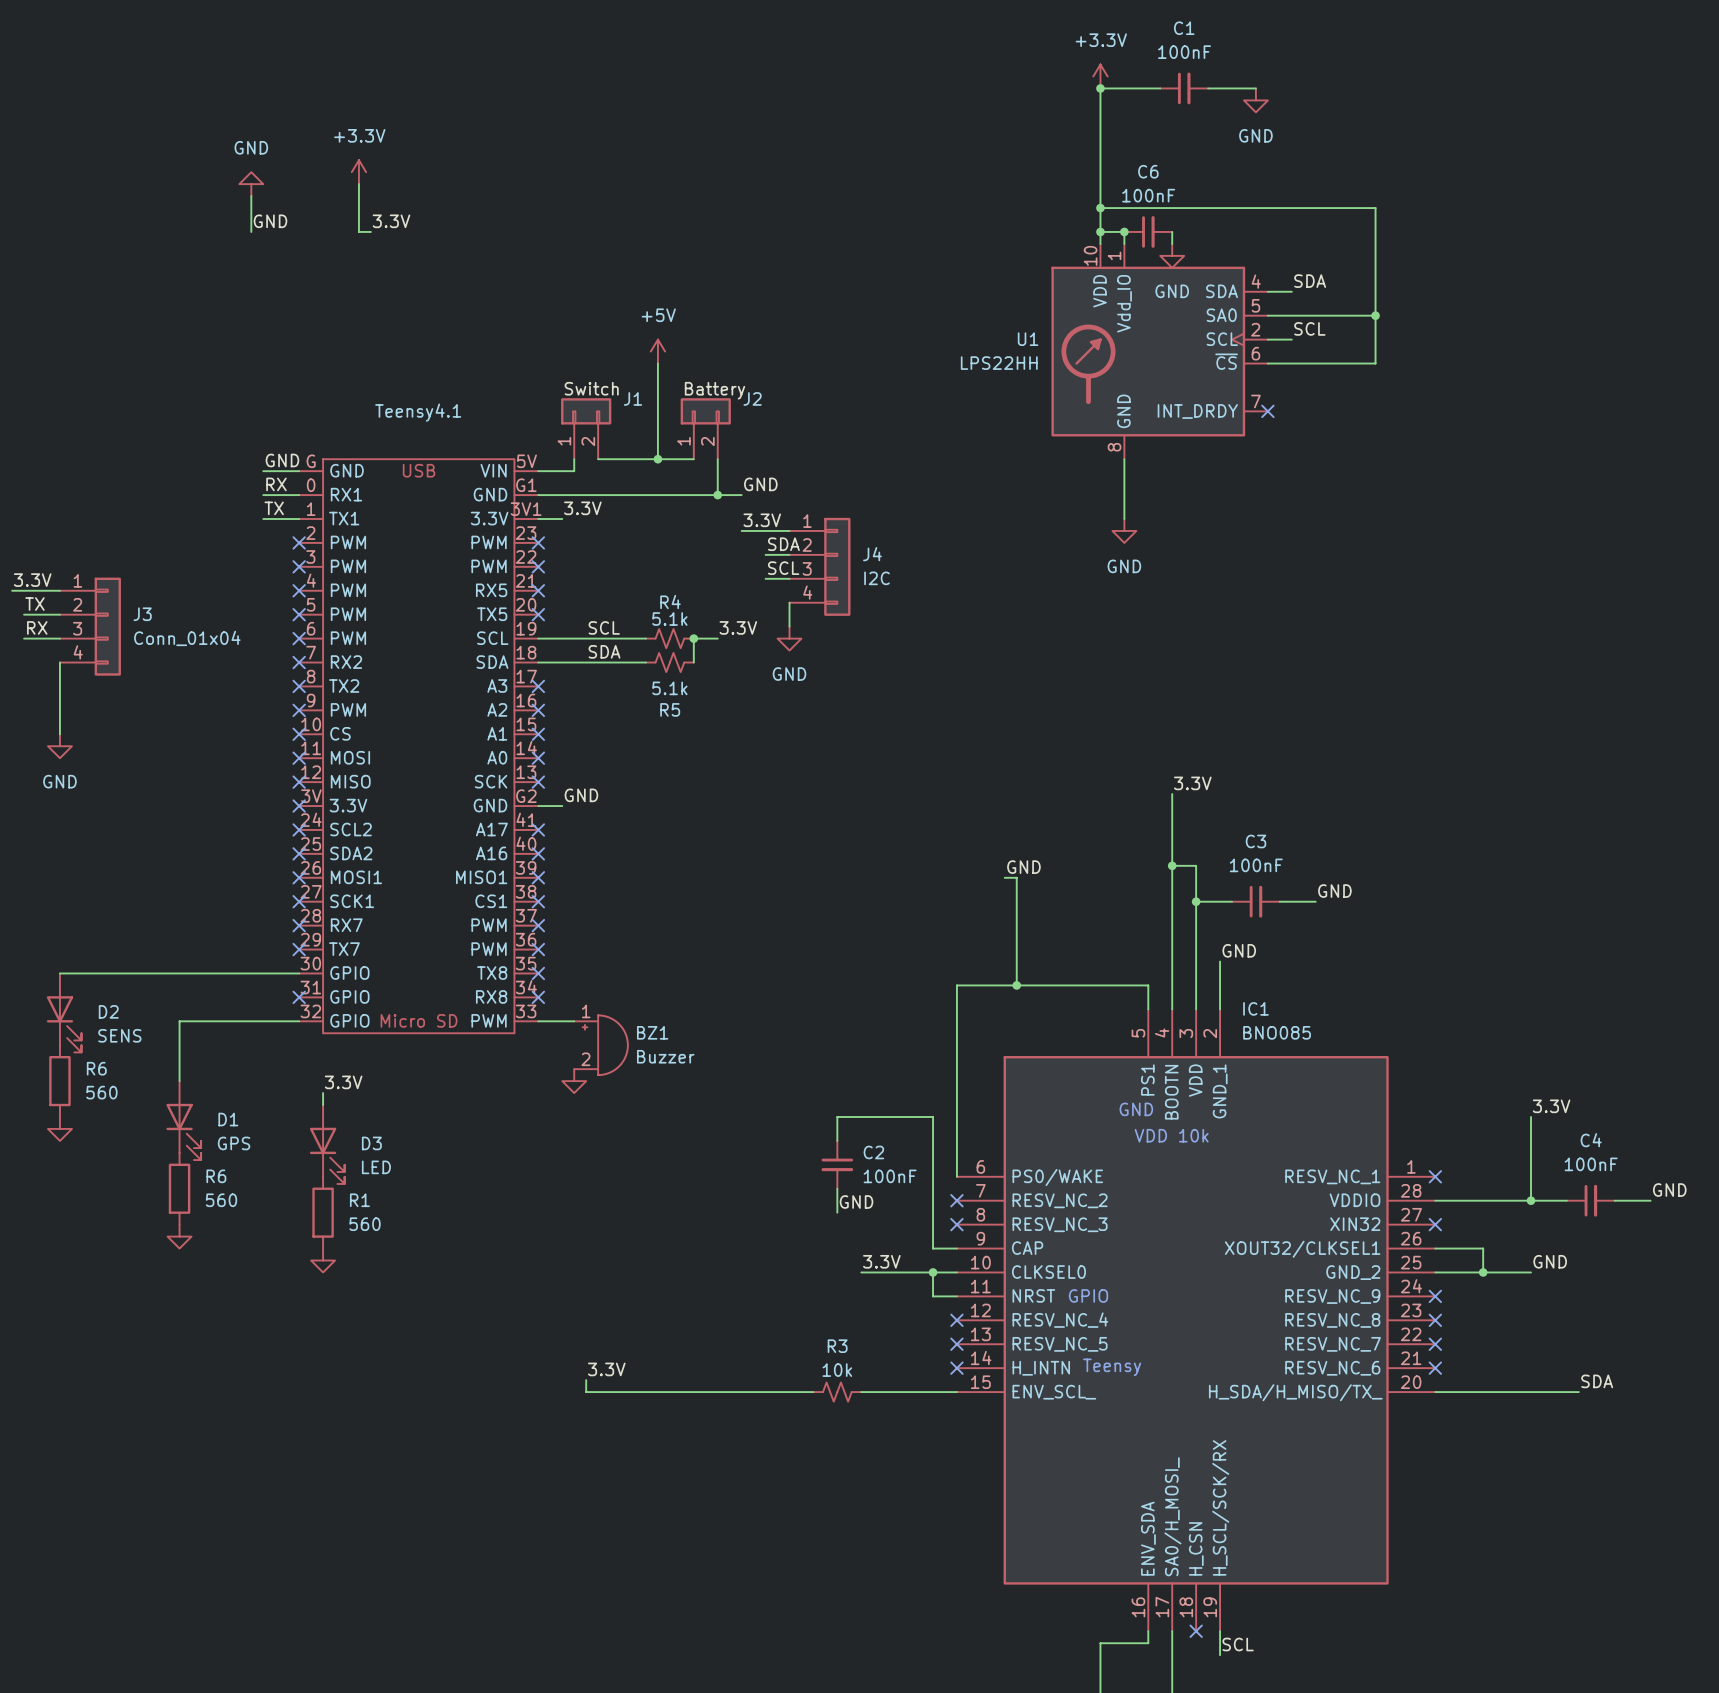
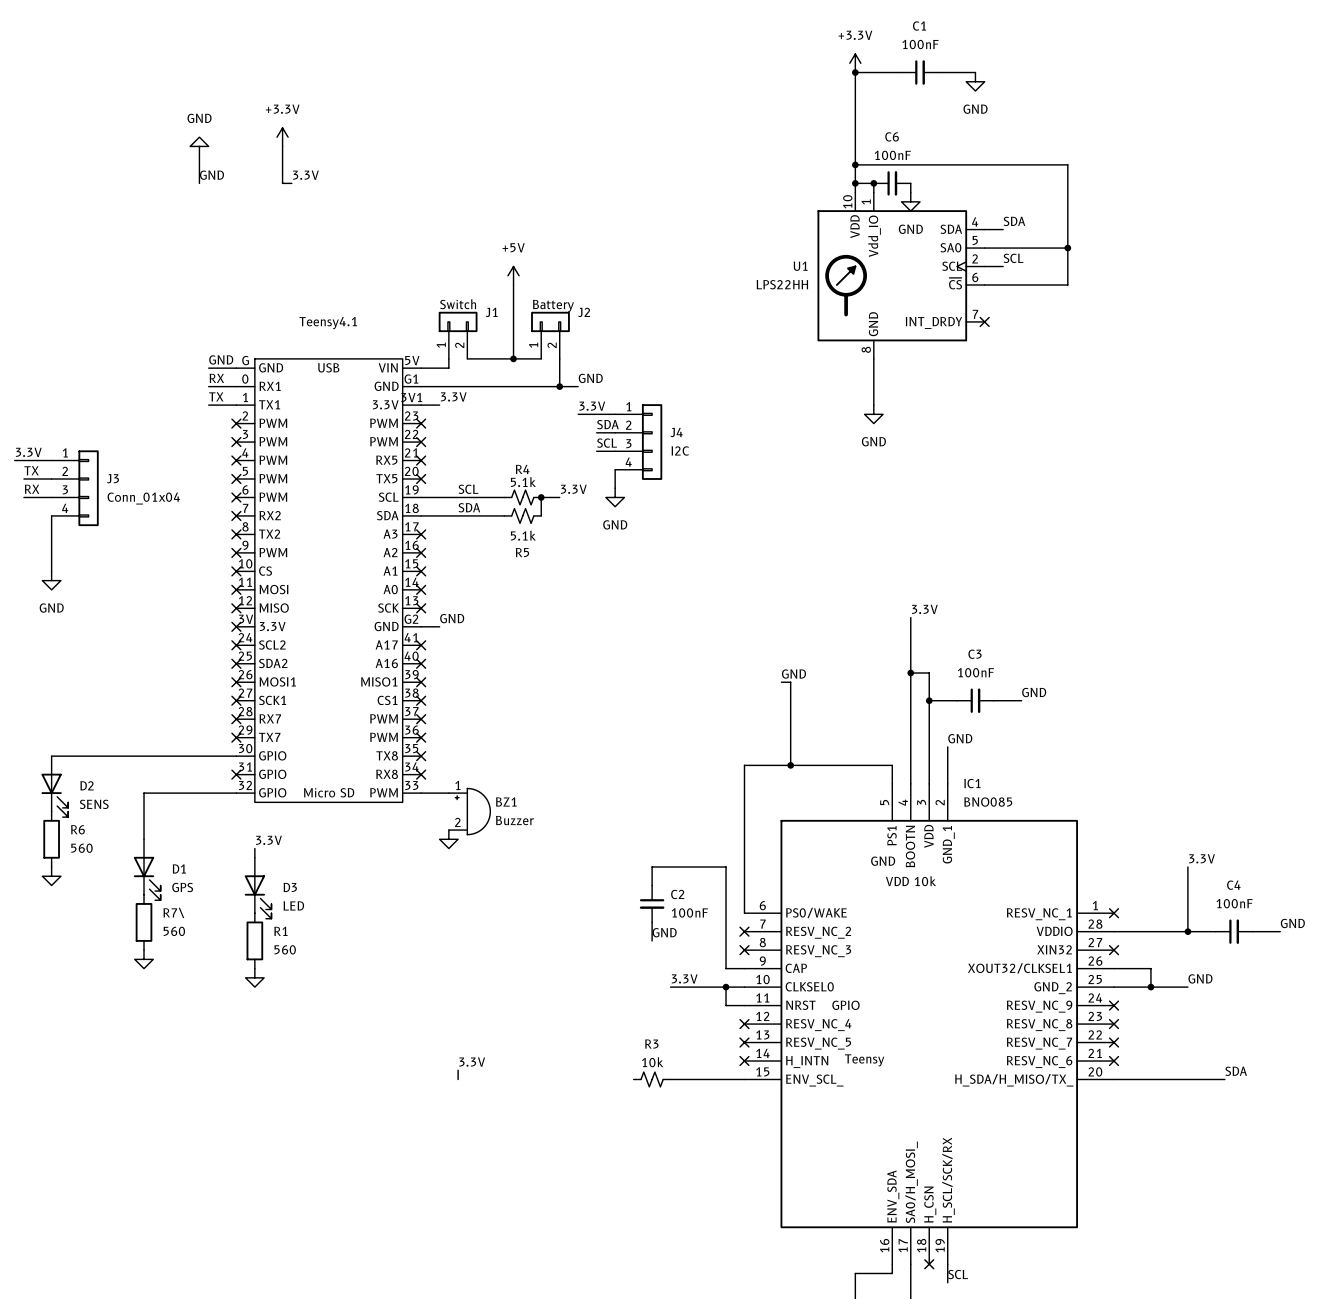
R6 name: R6 (216, 1176) -> R7\ (173, 912)
wire: (586, 1392) (813, 1392) -> none

